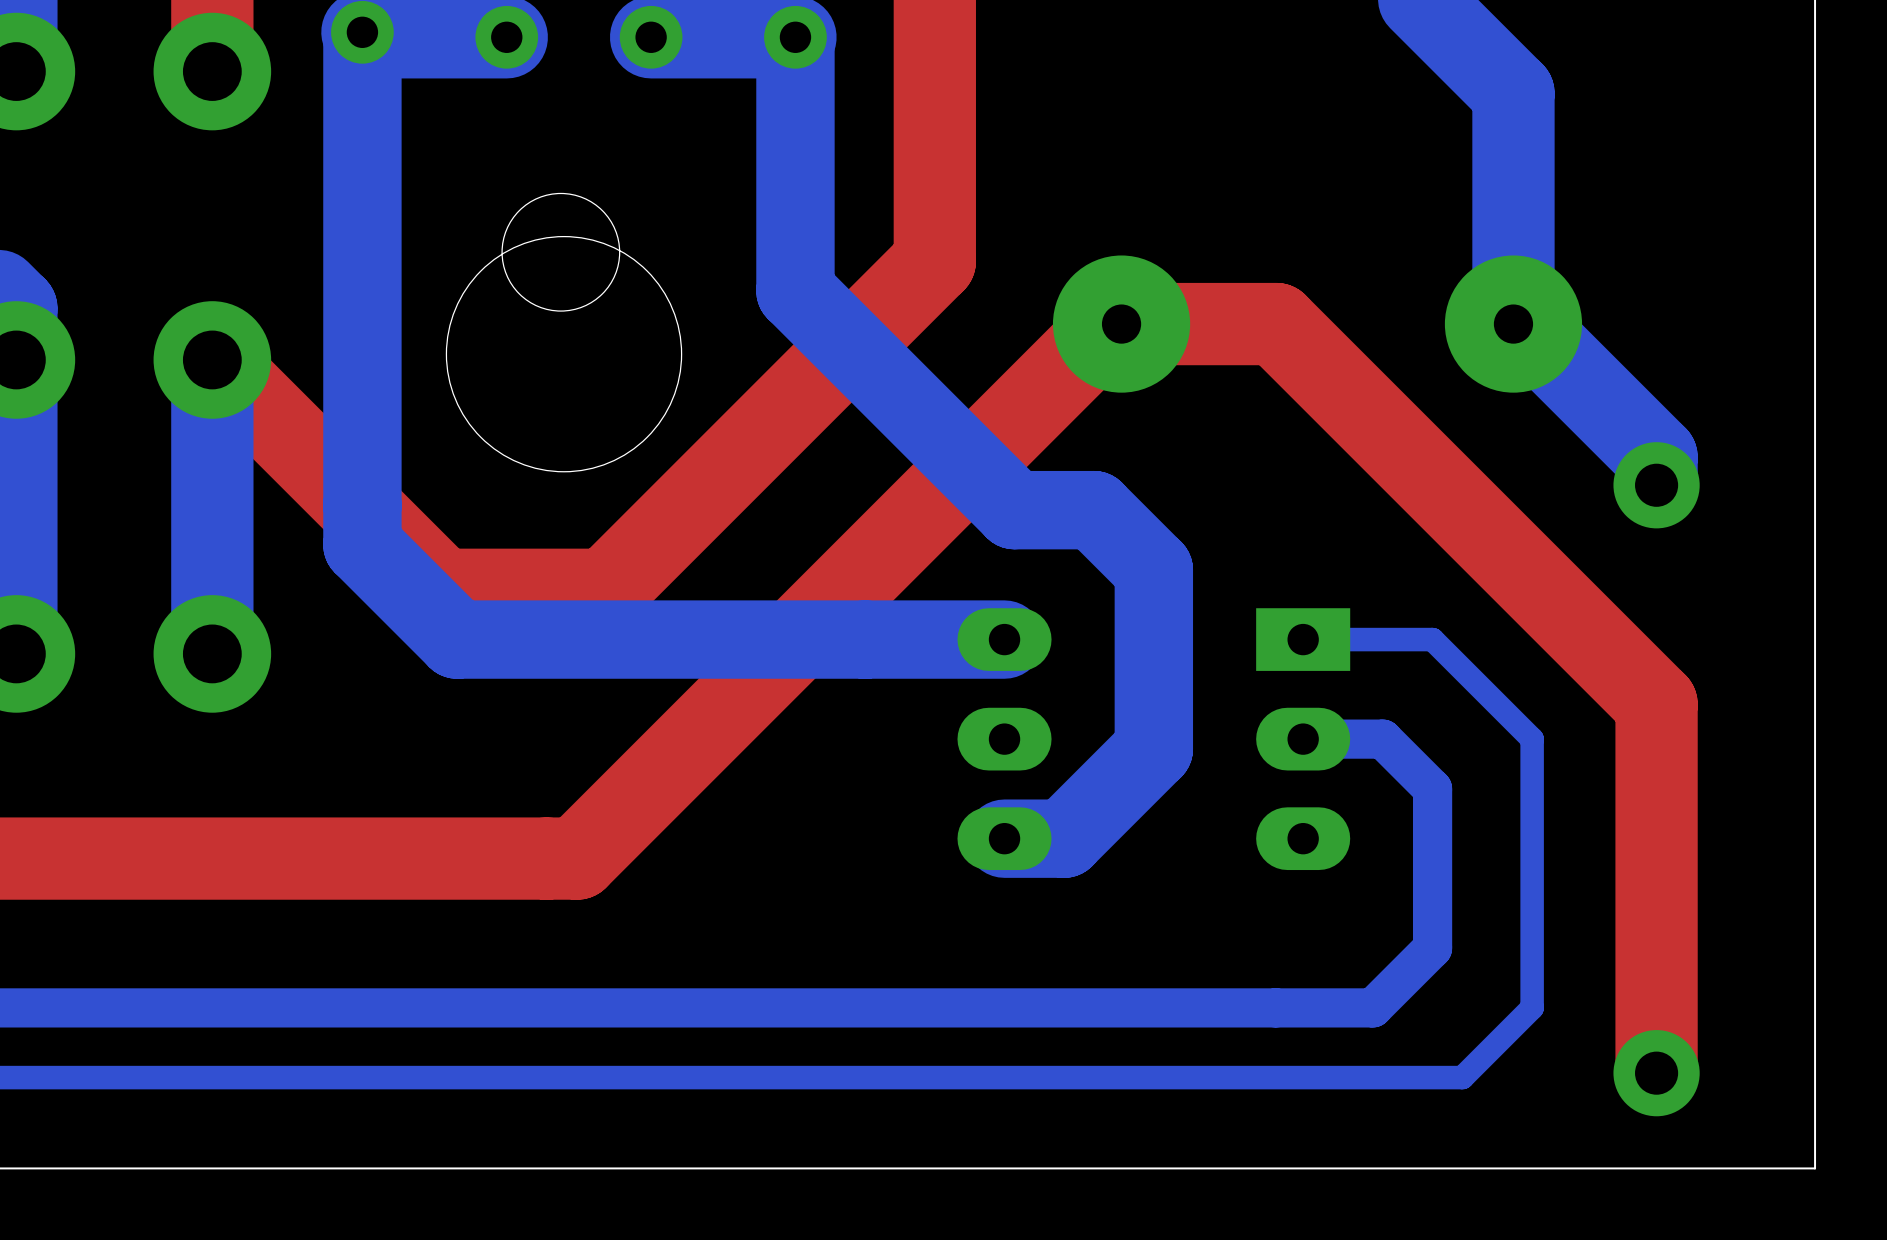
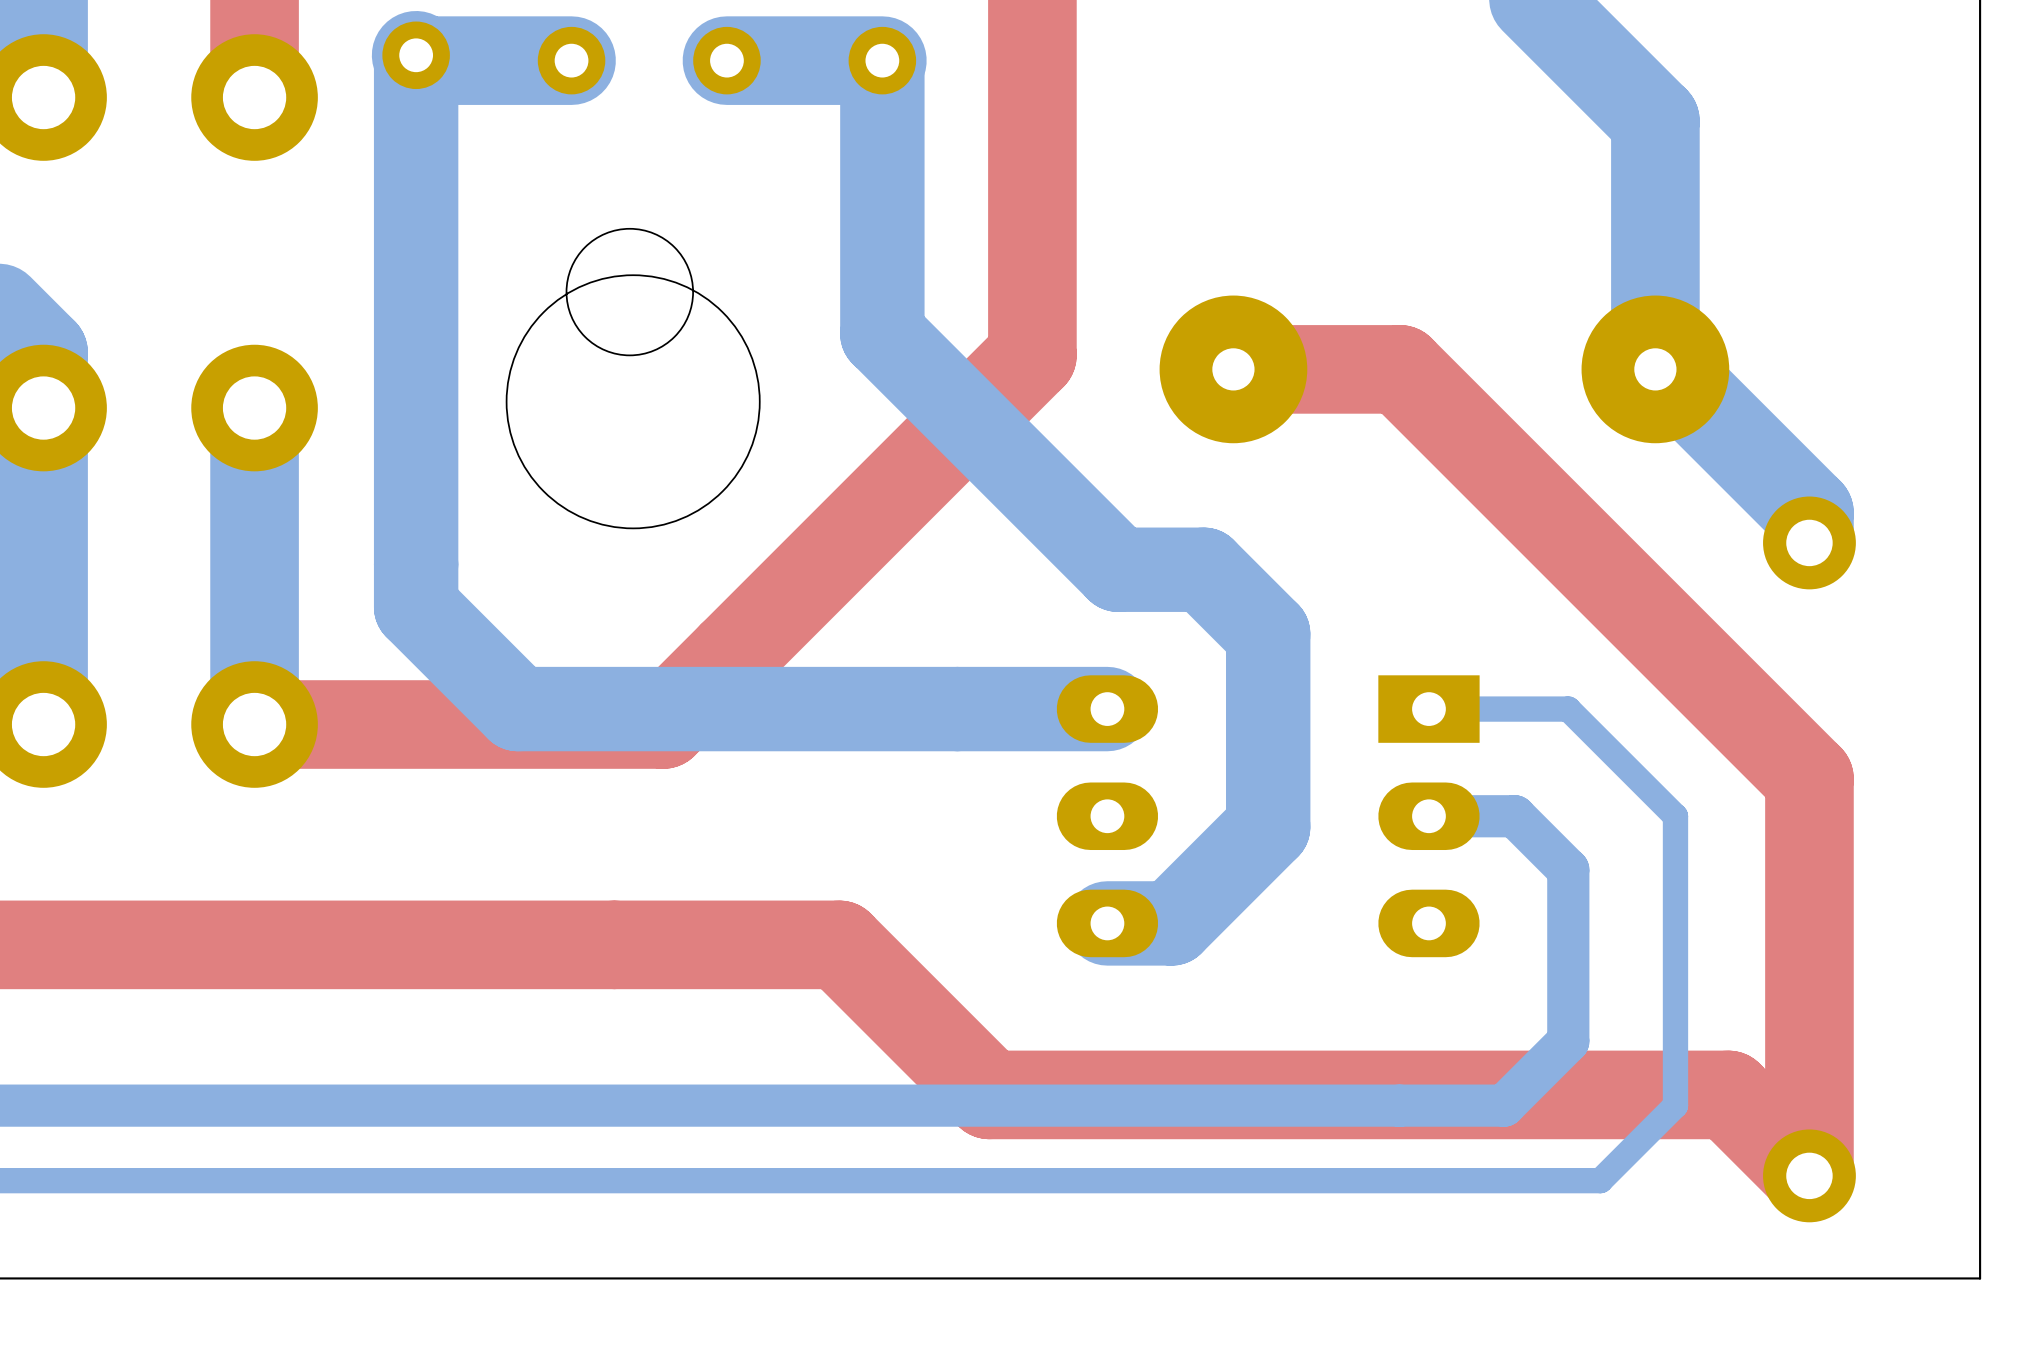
top track: (934, 261) (606, 589) (442, 589) (212, 359) -> (1032, 301) (1032, 355) (663, 724) (254, 724)
top track: (1121, 314) (577, 858) -> (1809, 1175) (1728, 1094) (989, 1094) (839, 944) (647, 944)

